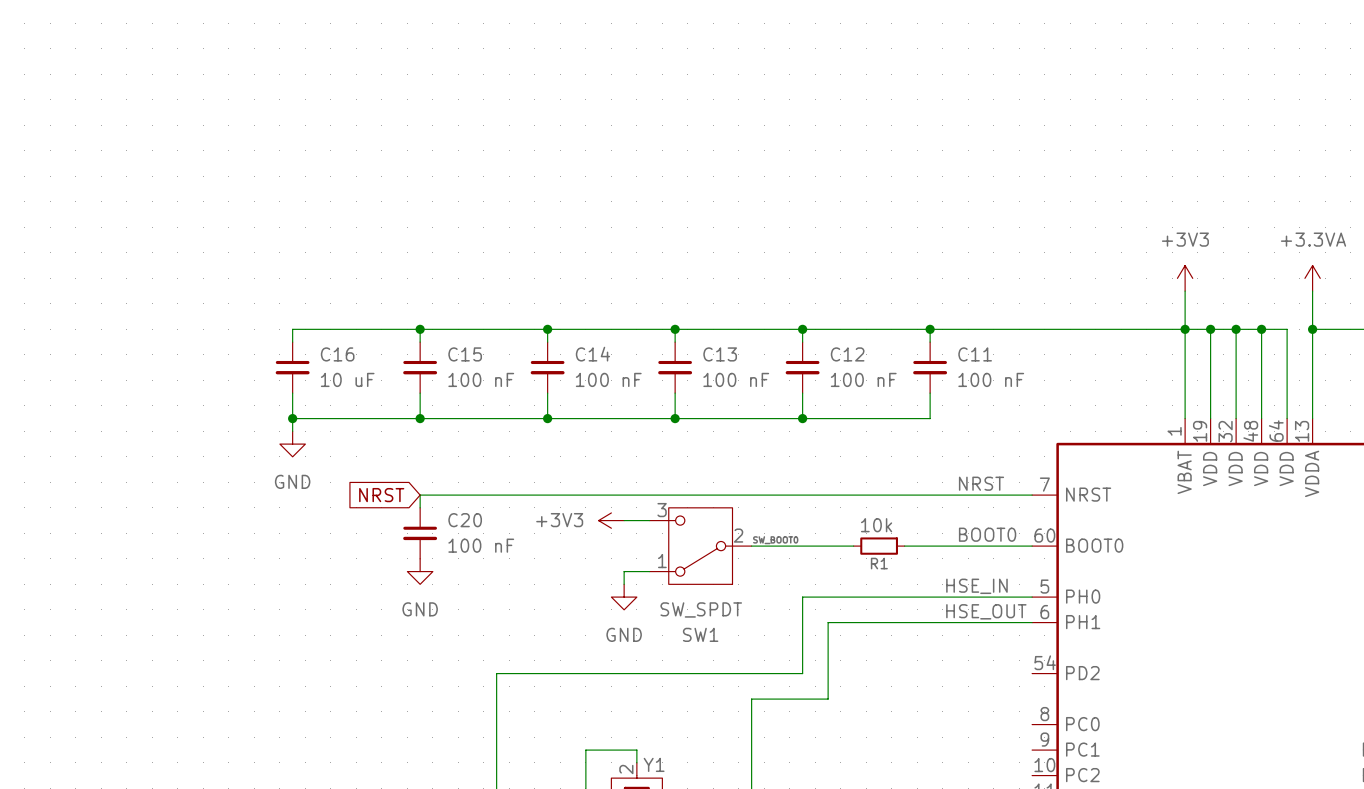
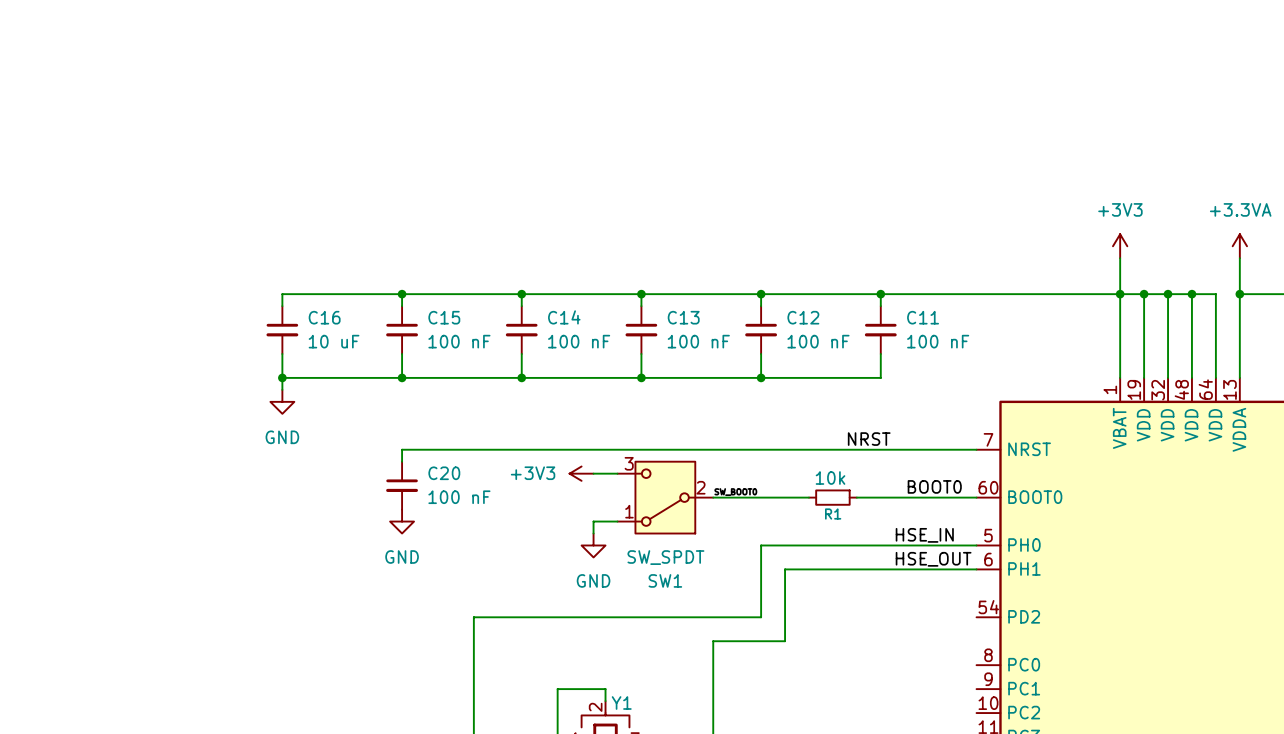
label position: NRST (981, 483) -> NRST (869, 439)
global label: NRST (381, 495) -> none

